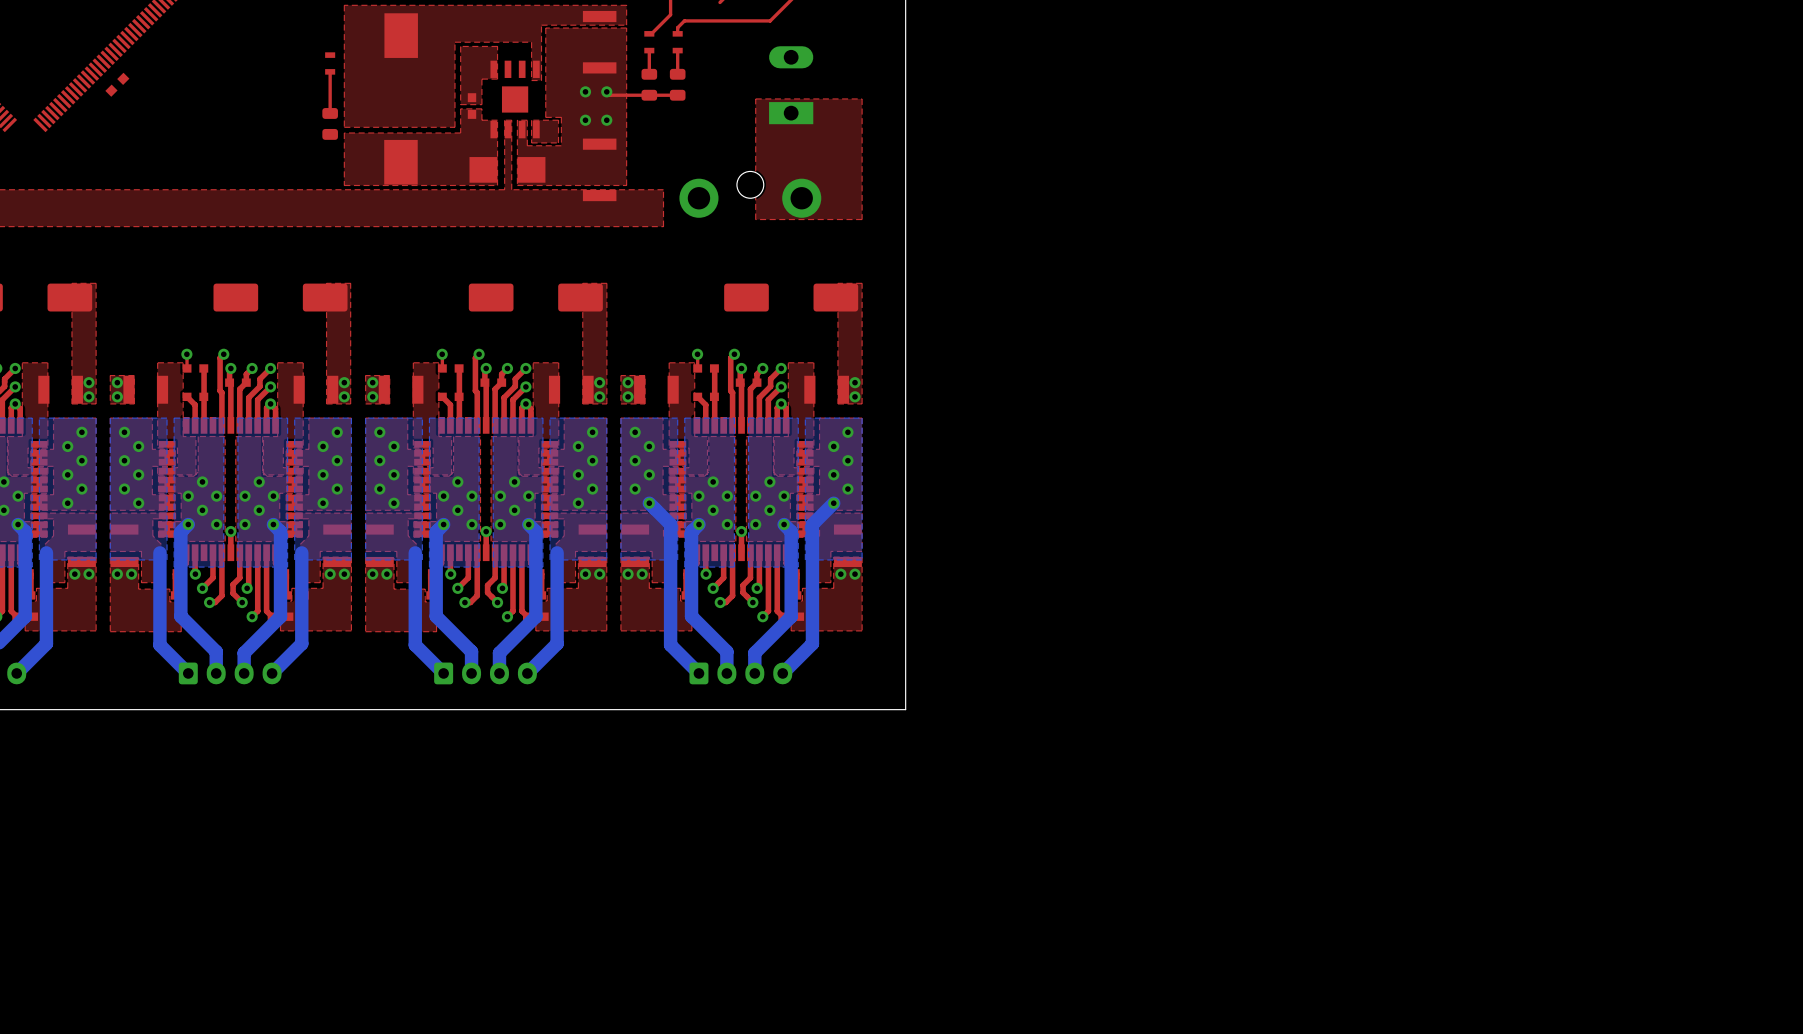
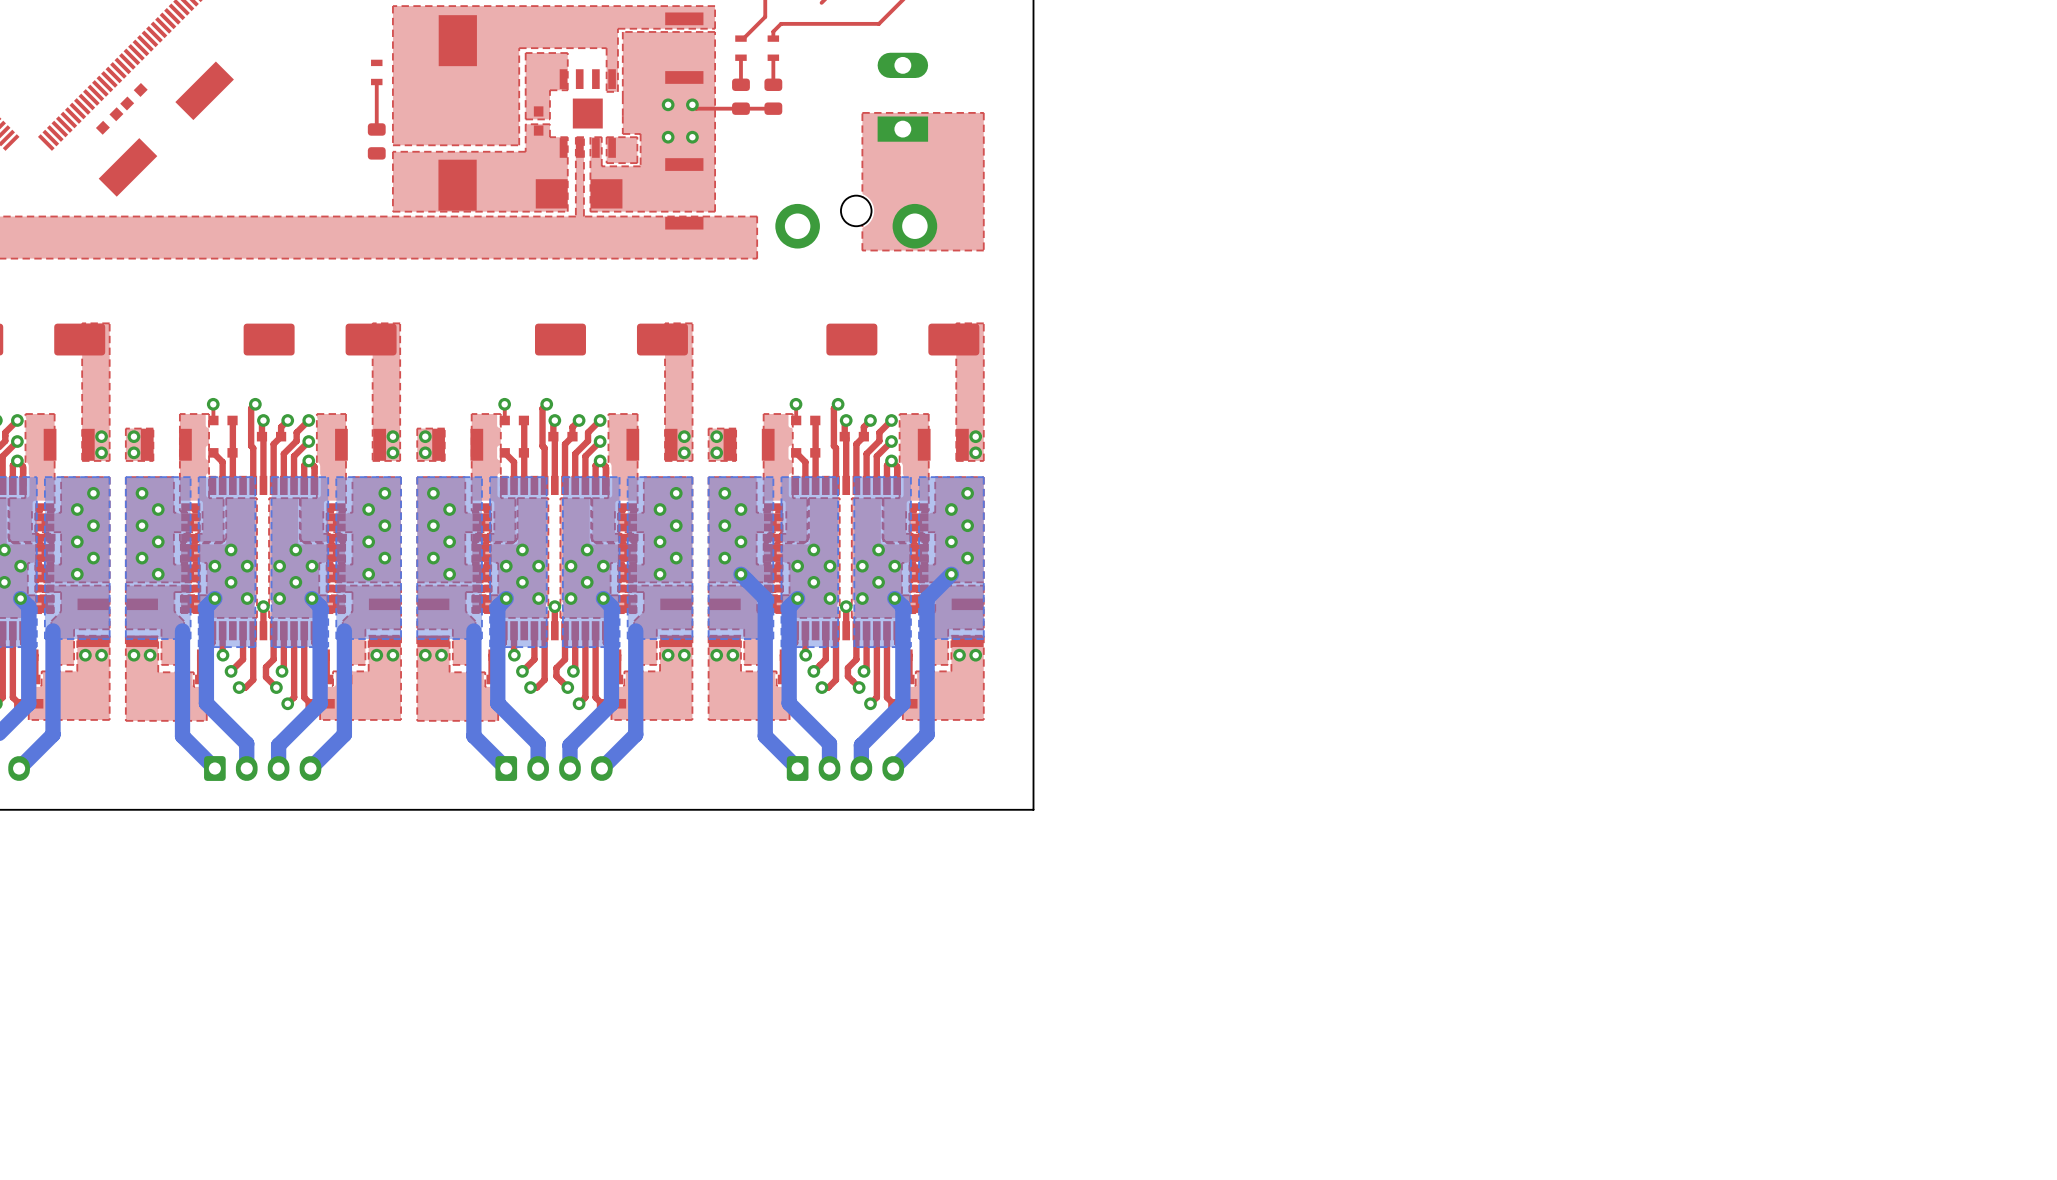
part: none -> (109, 121)
part: none -> (166, 129)

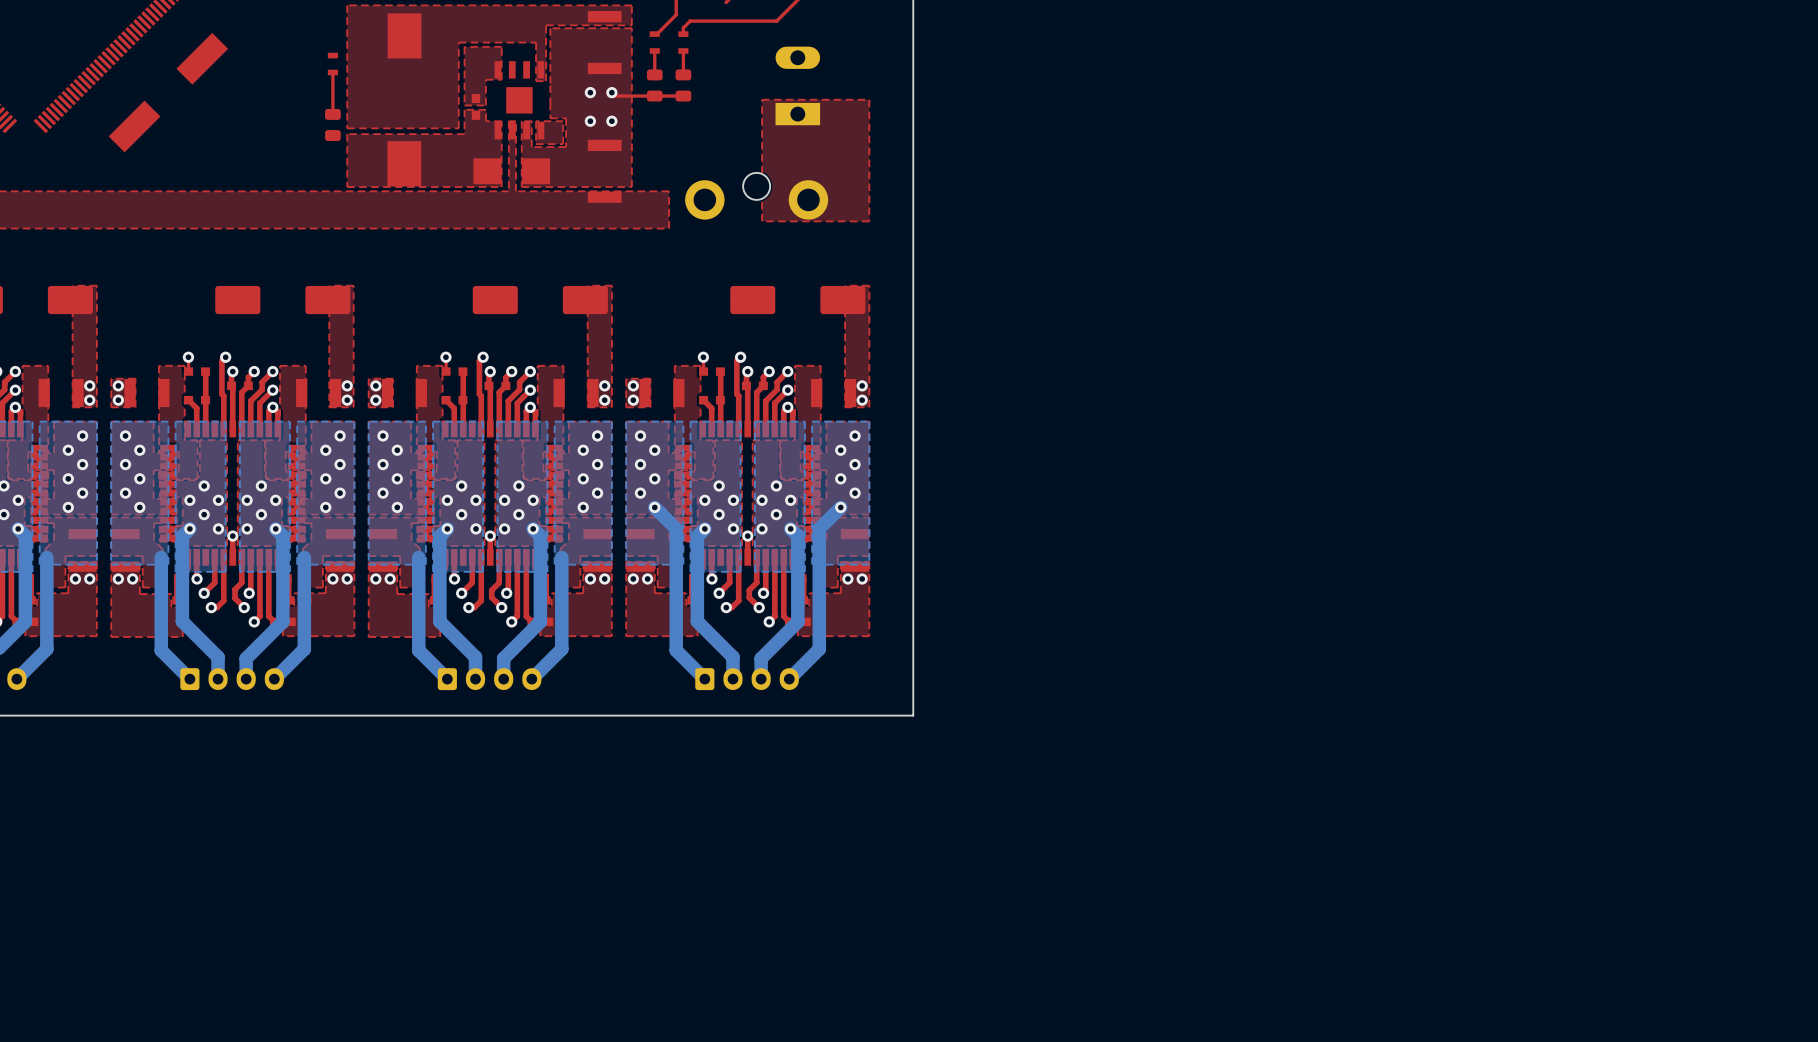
part: (133, 96) -> none
part: (109, 121) -> none
part position: (166, 129) -> (168, 92)

